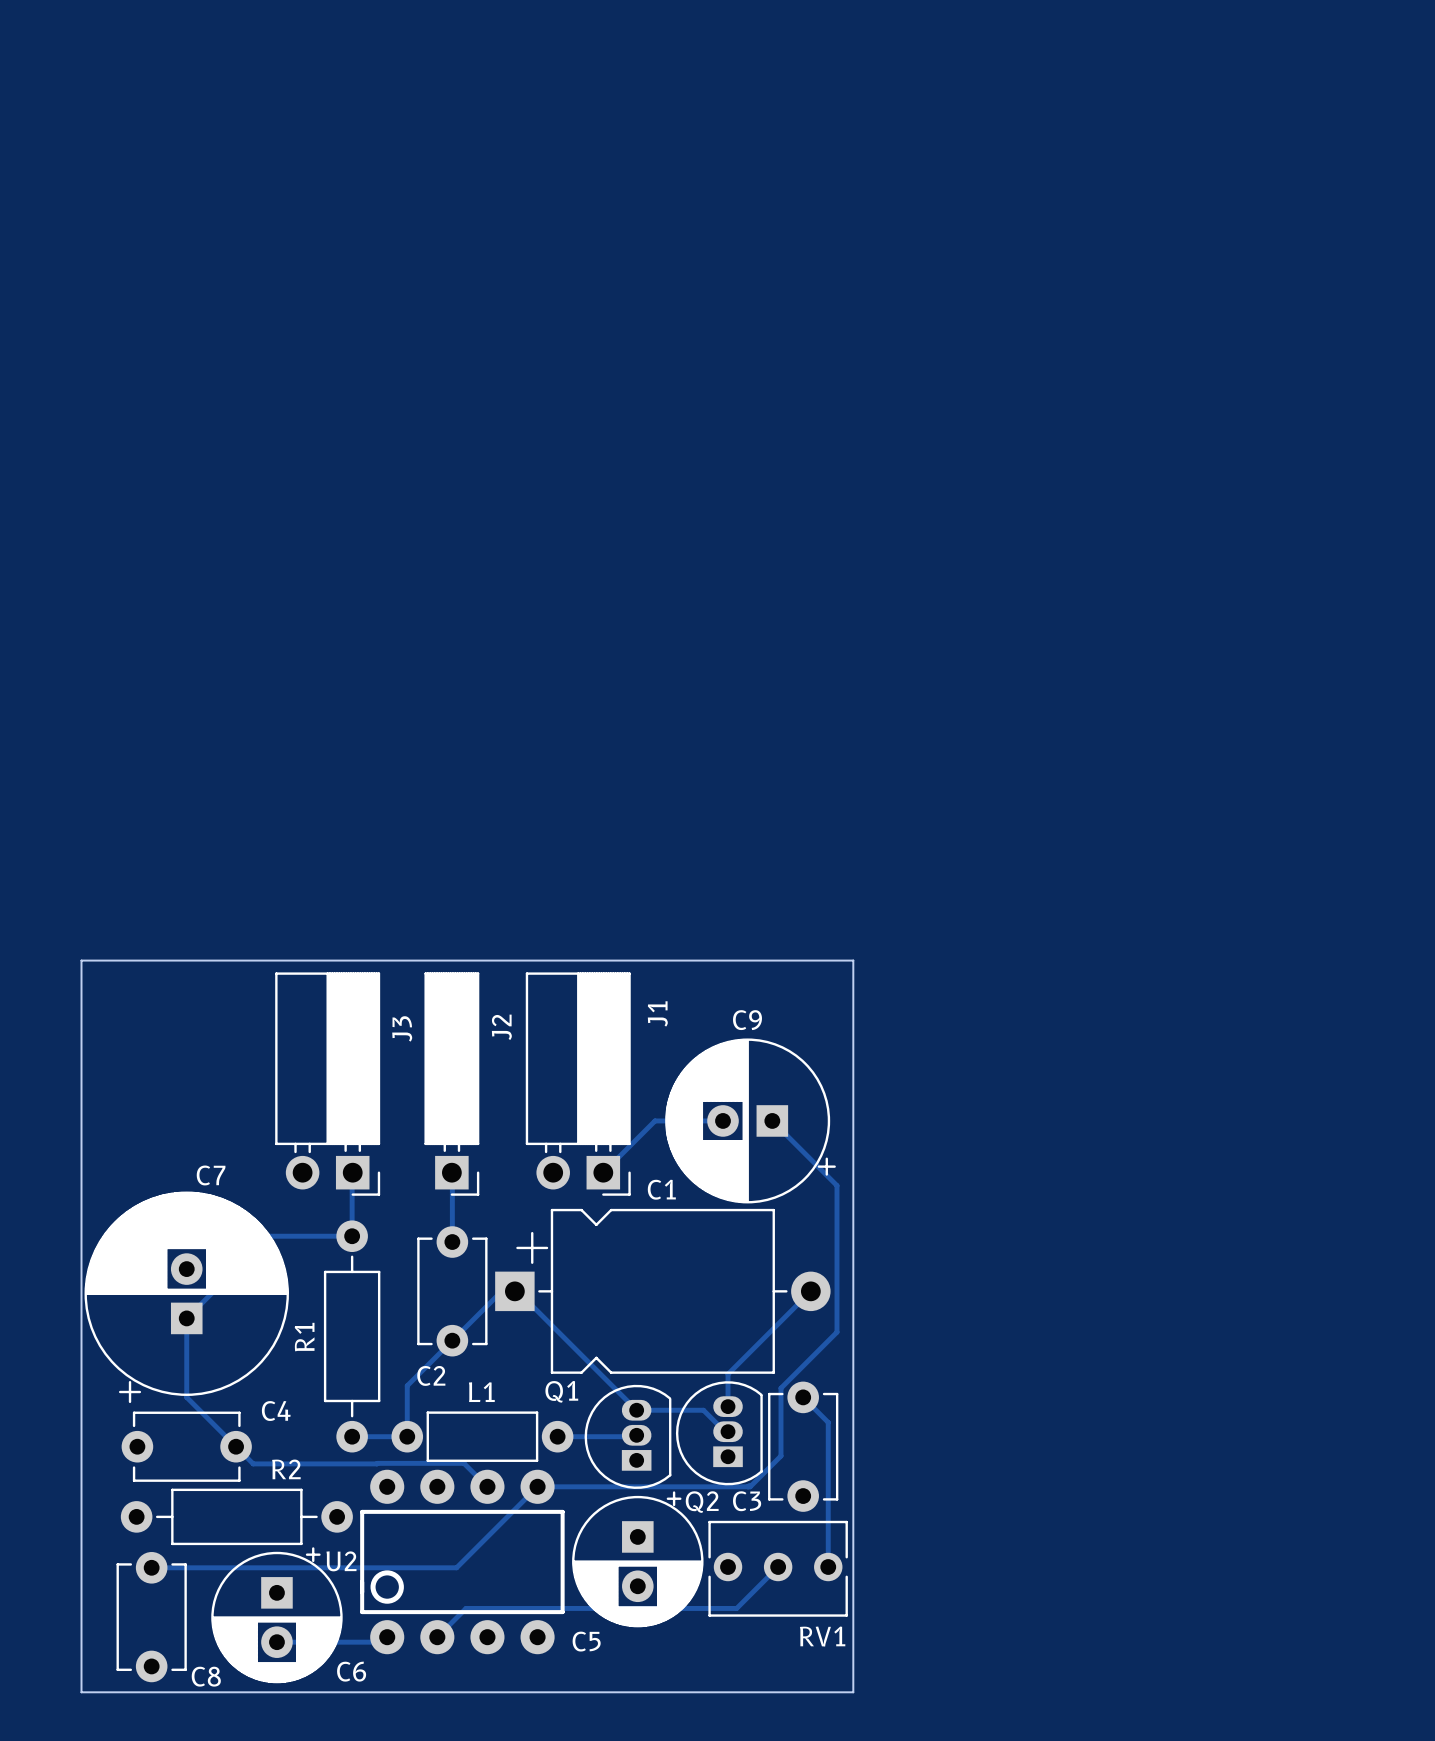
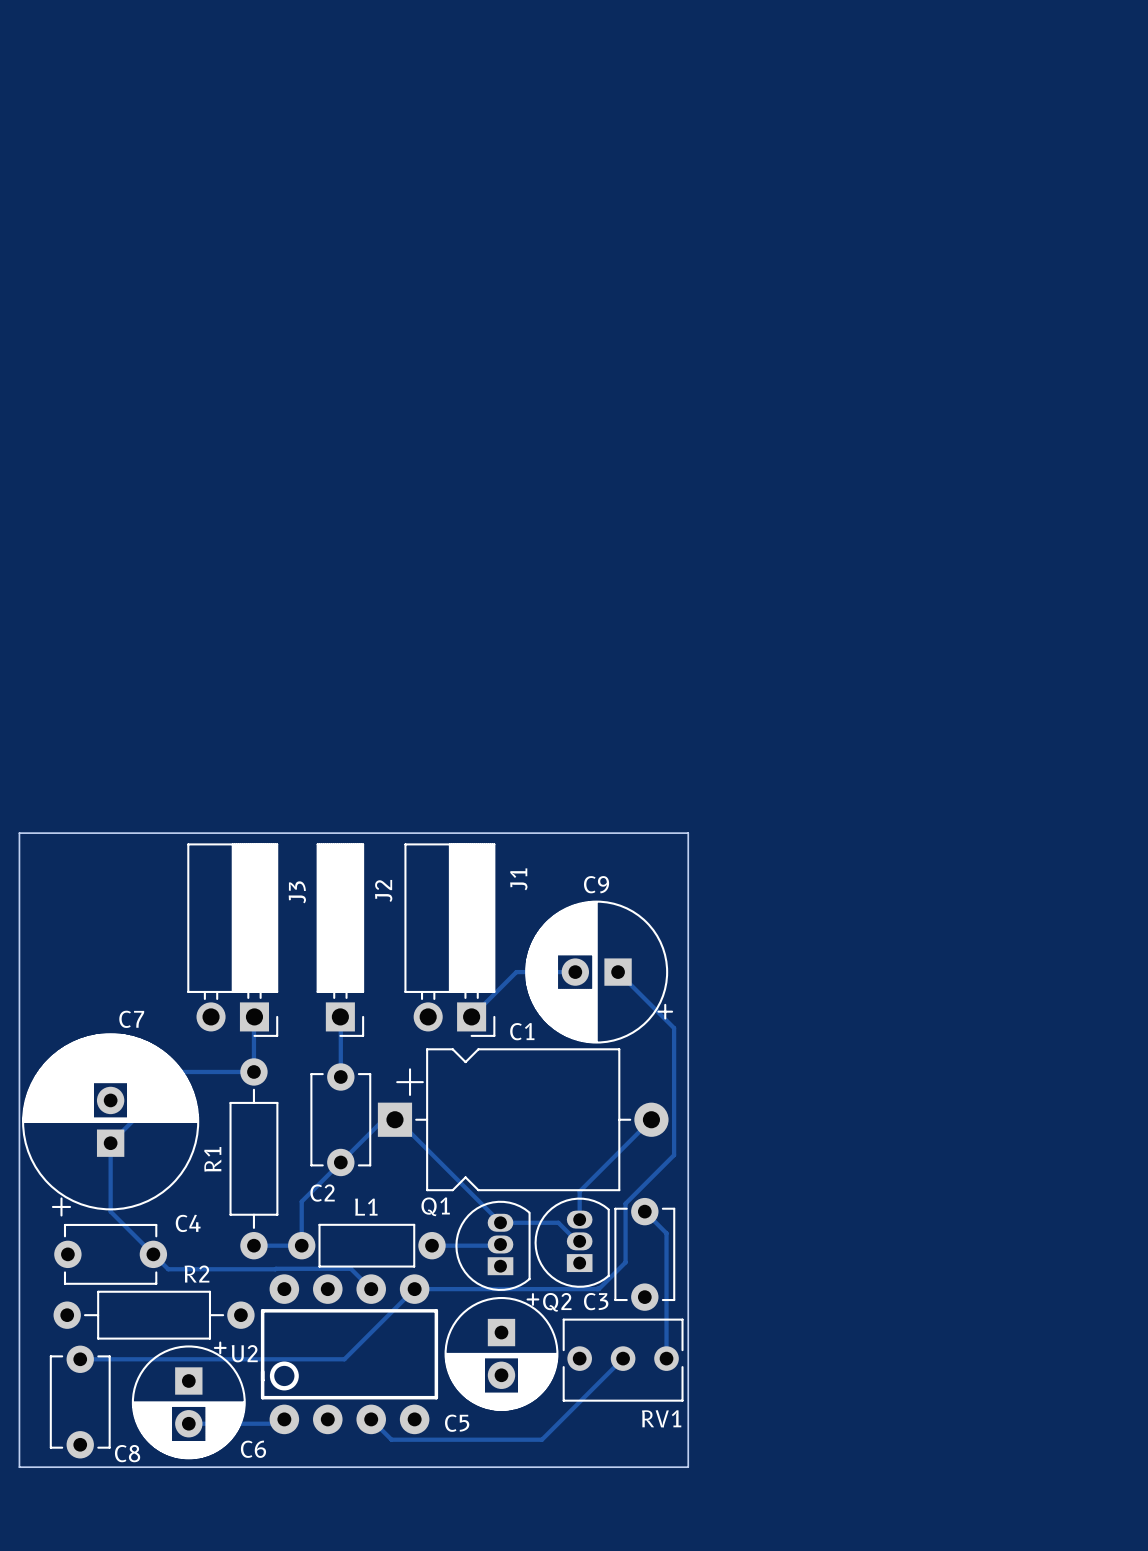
track: (736, 1608) (466, 1608) (437, 1637) -> (587, 1394) (541, 1439) (391, 1439) (371, 1419)

